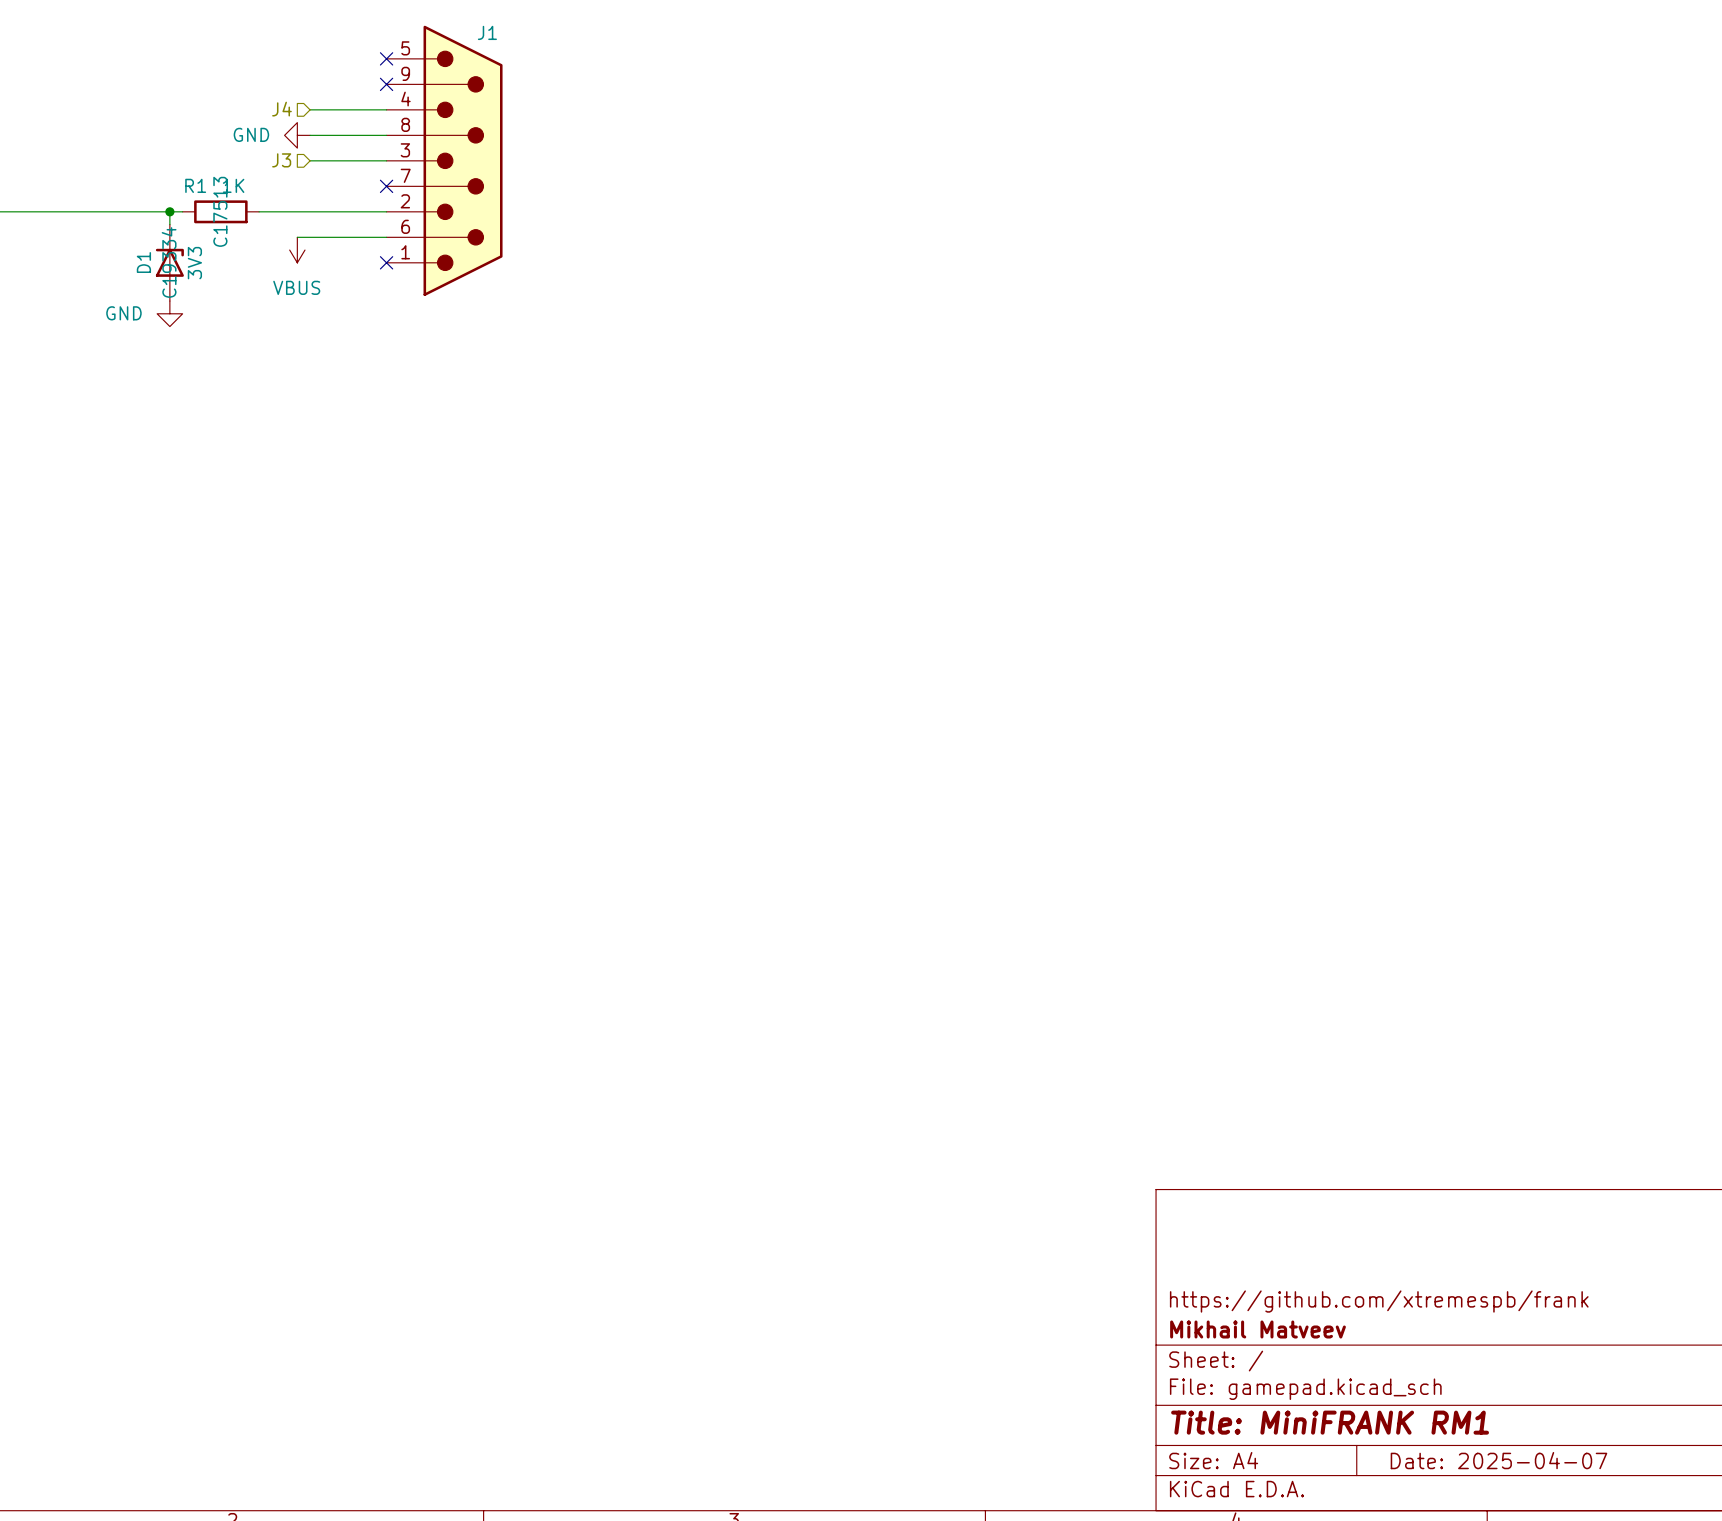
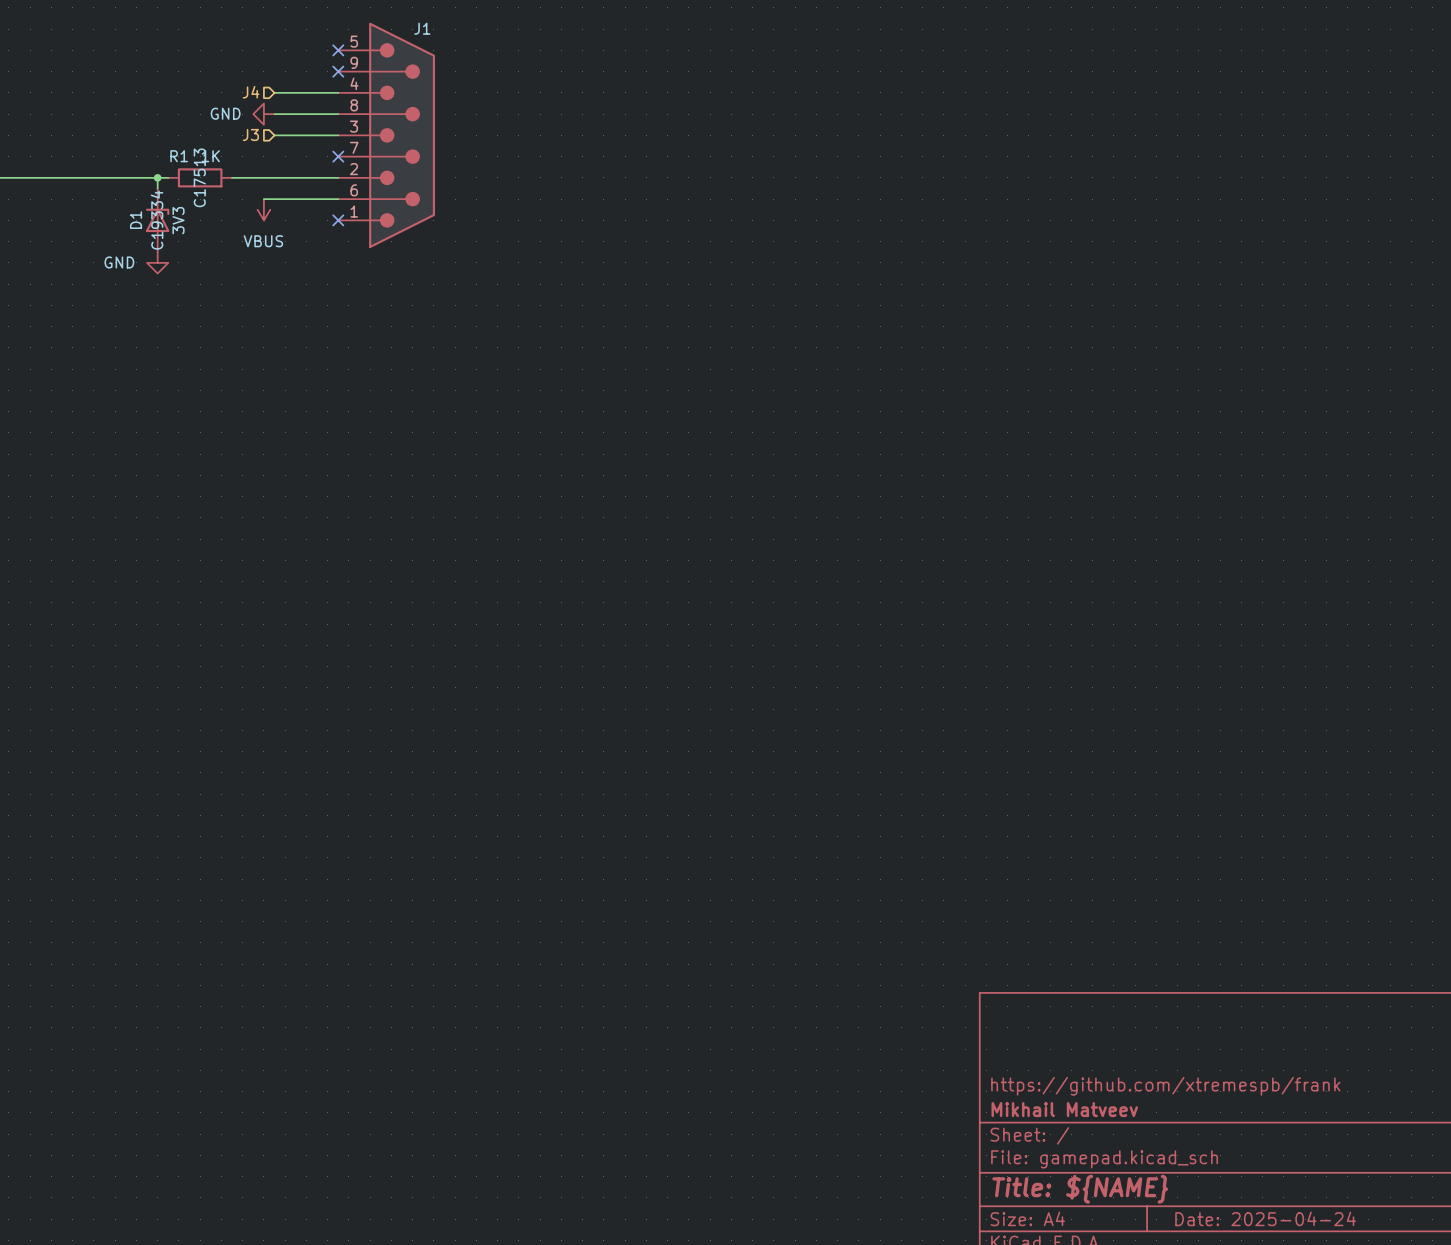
title block: Title: MiniFRANK RM1 (1330, 1422) -> Title: ${NAME} (1080, 1189)
title block: Date: 2025-04-07 (1498, 1460) -> Date: 2025-04-24 (1265, 1218)

